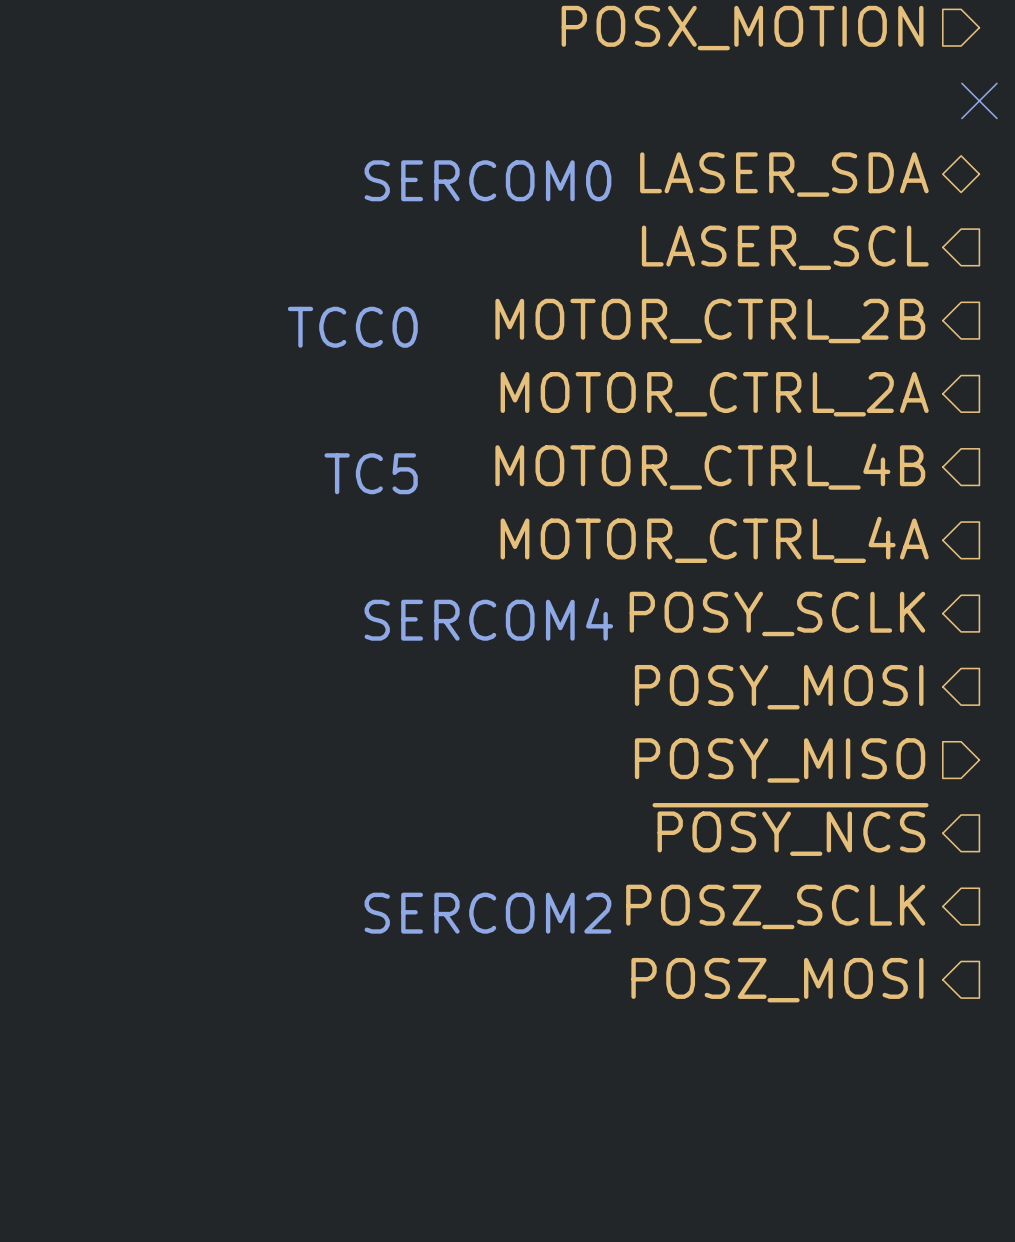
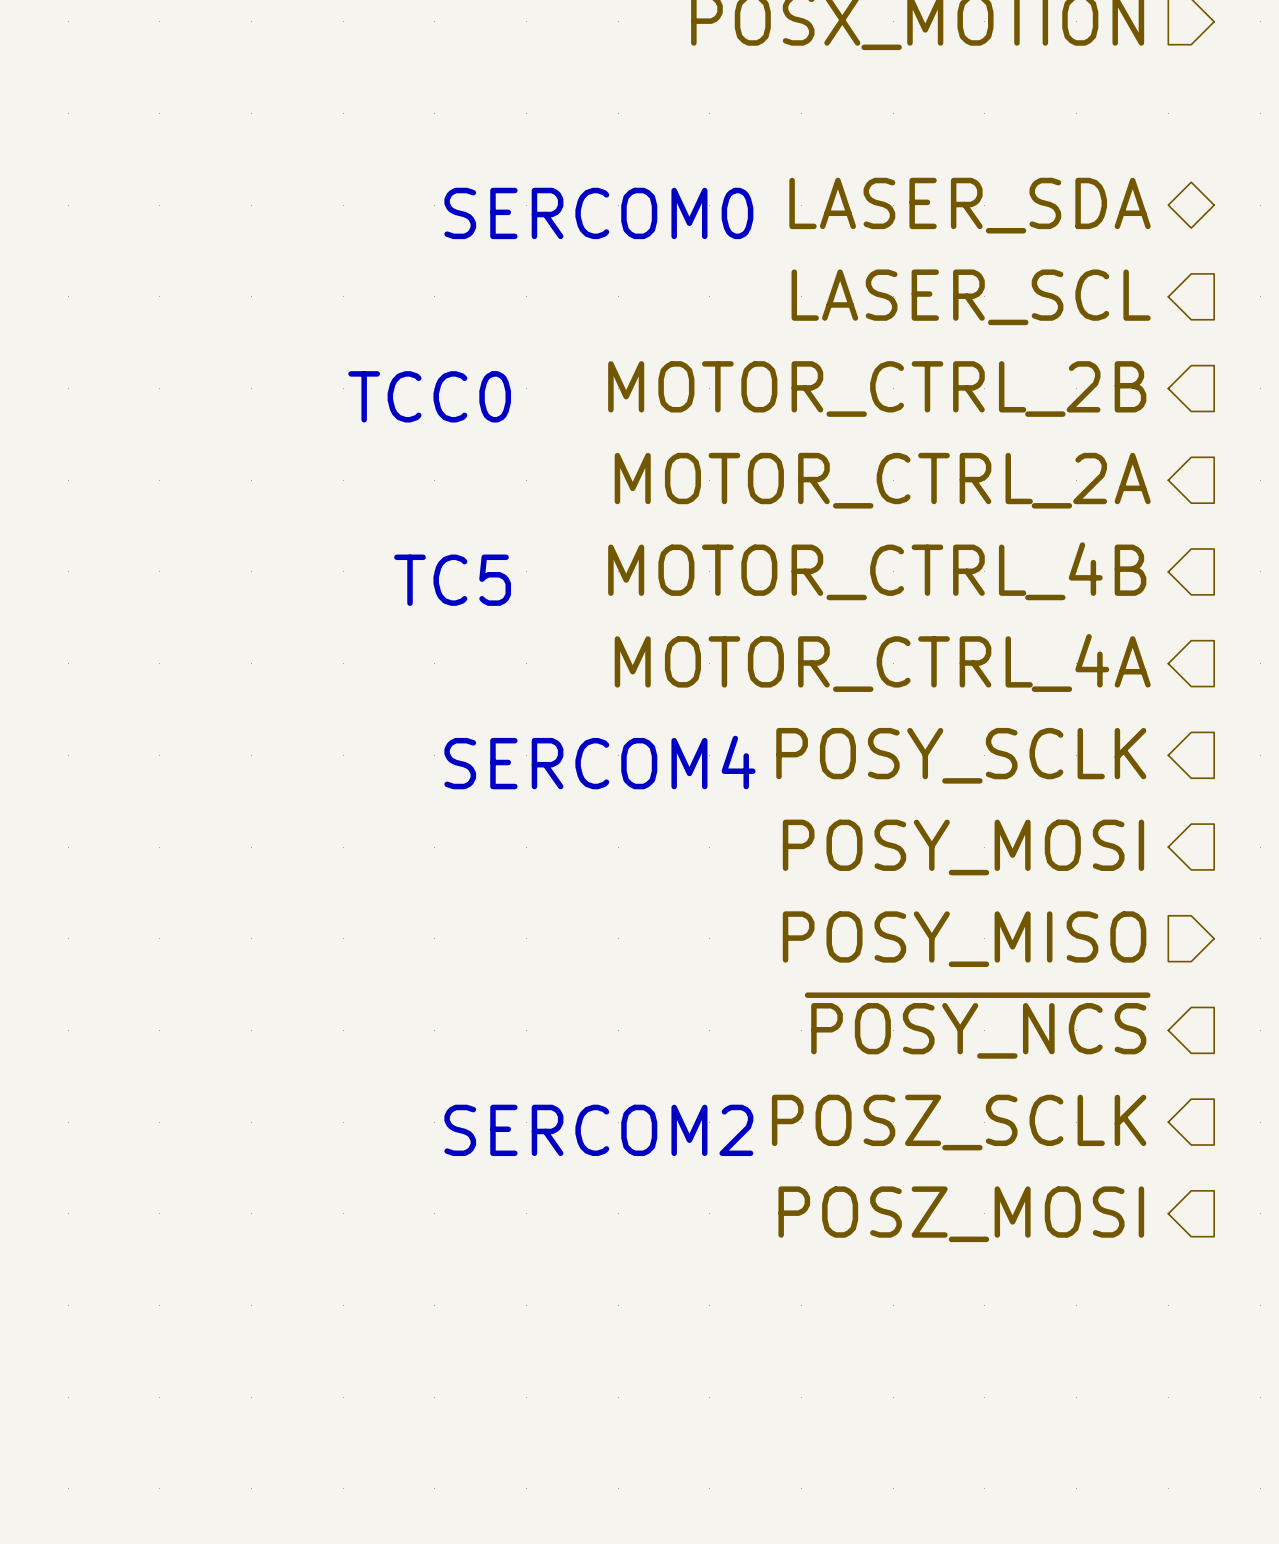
no-connect mark: (979, 100) -> none

